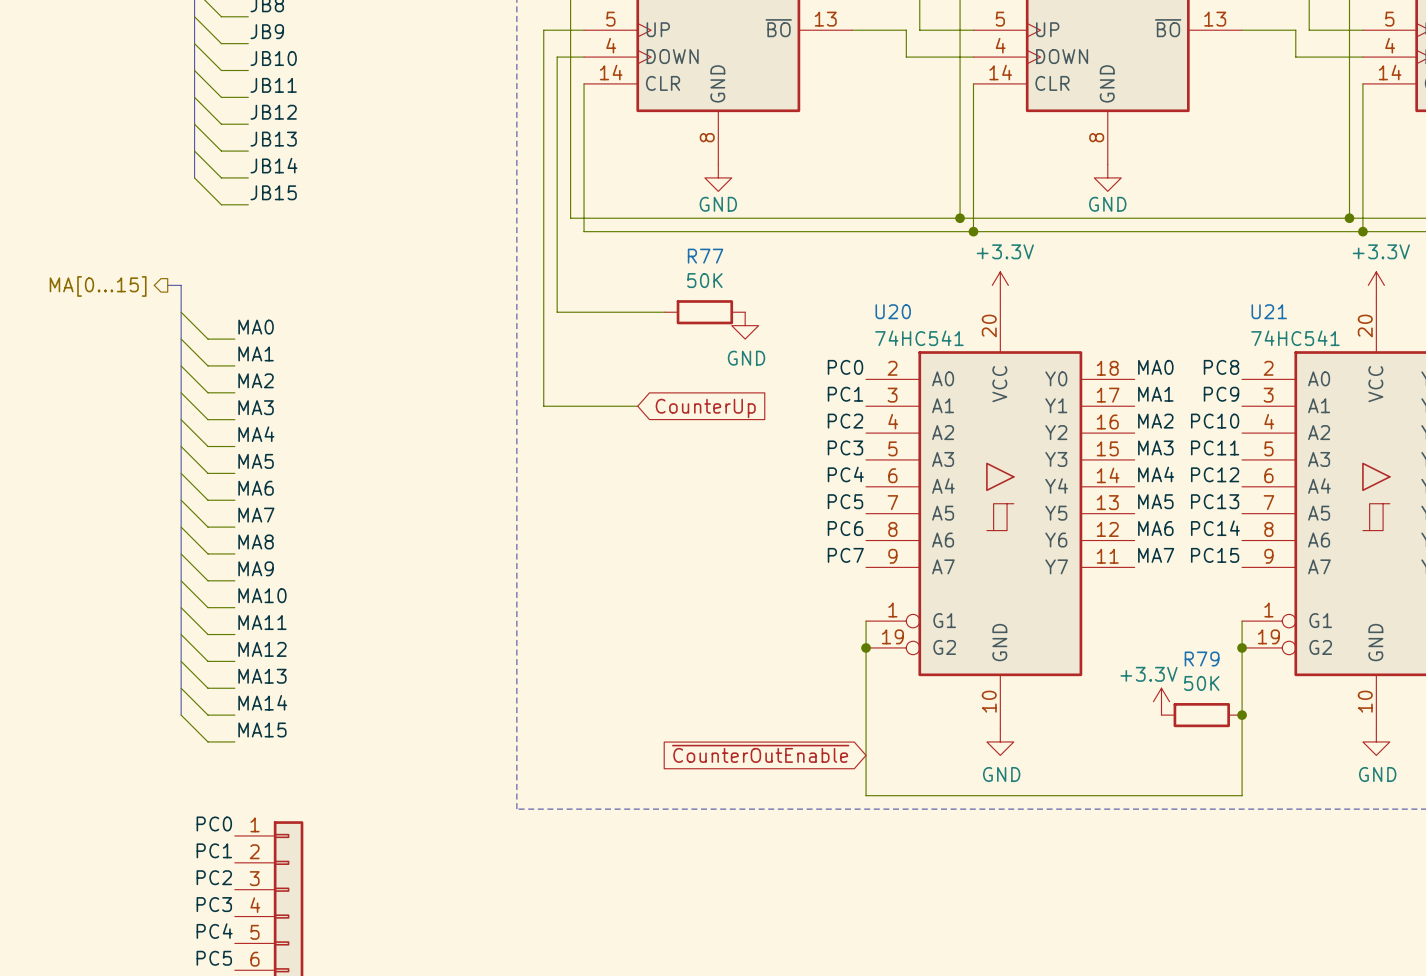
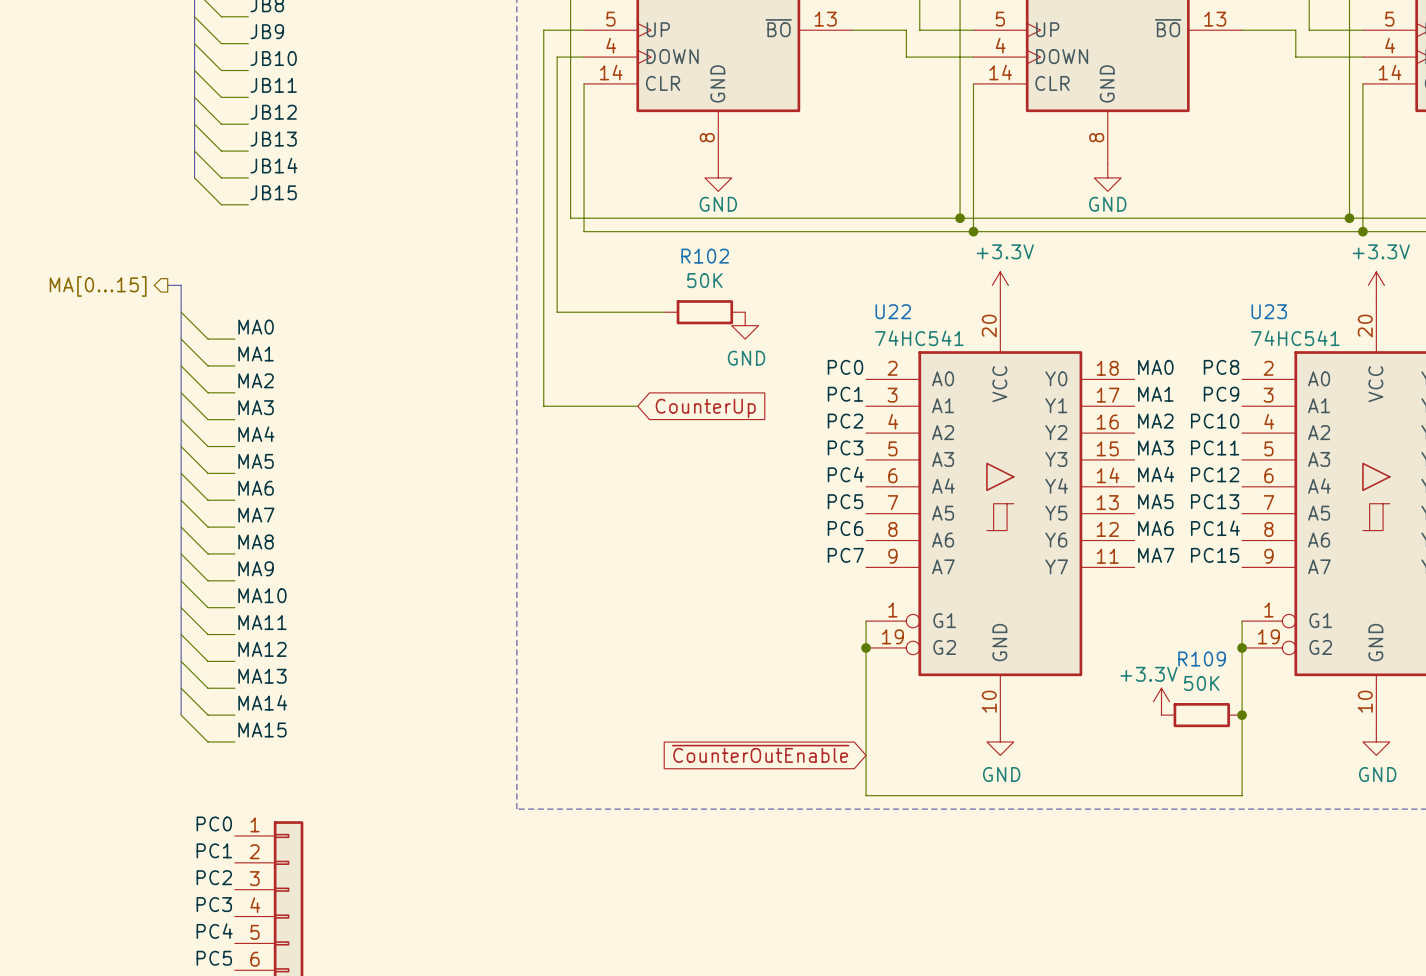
R77 name: R77 (705, 256) -> R102 (705, 256)
U20 name: U20 (893, 311) -> U22 (893, 311)
U21 name: U21 (1269, 311) -> U23 (1269, 311)
R79 name: R79 (1202, 659) -> R109 (1202, 659)

